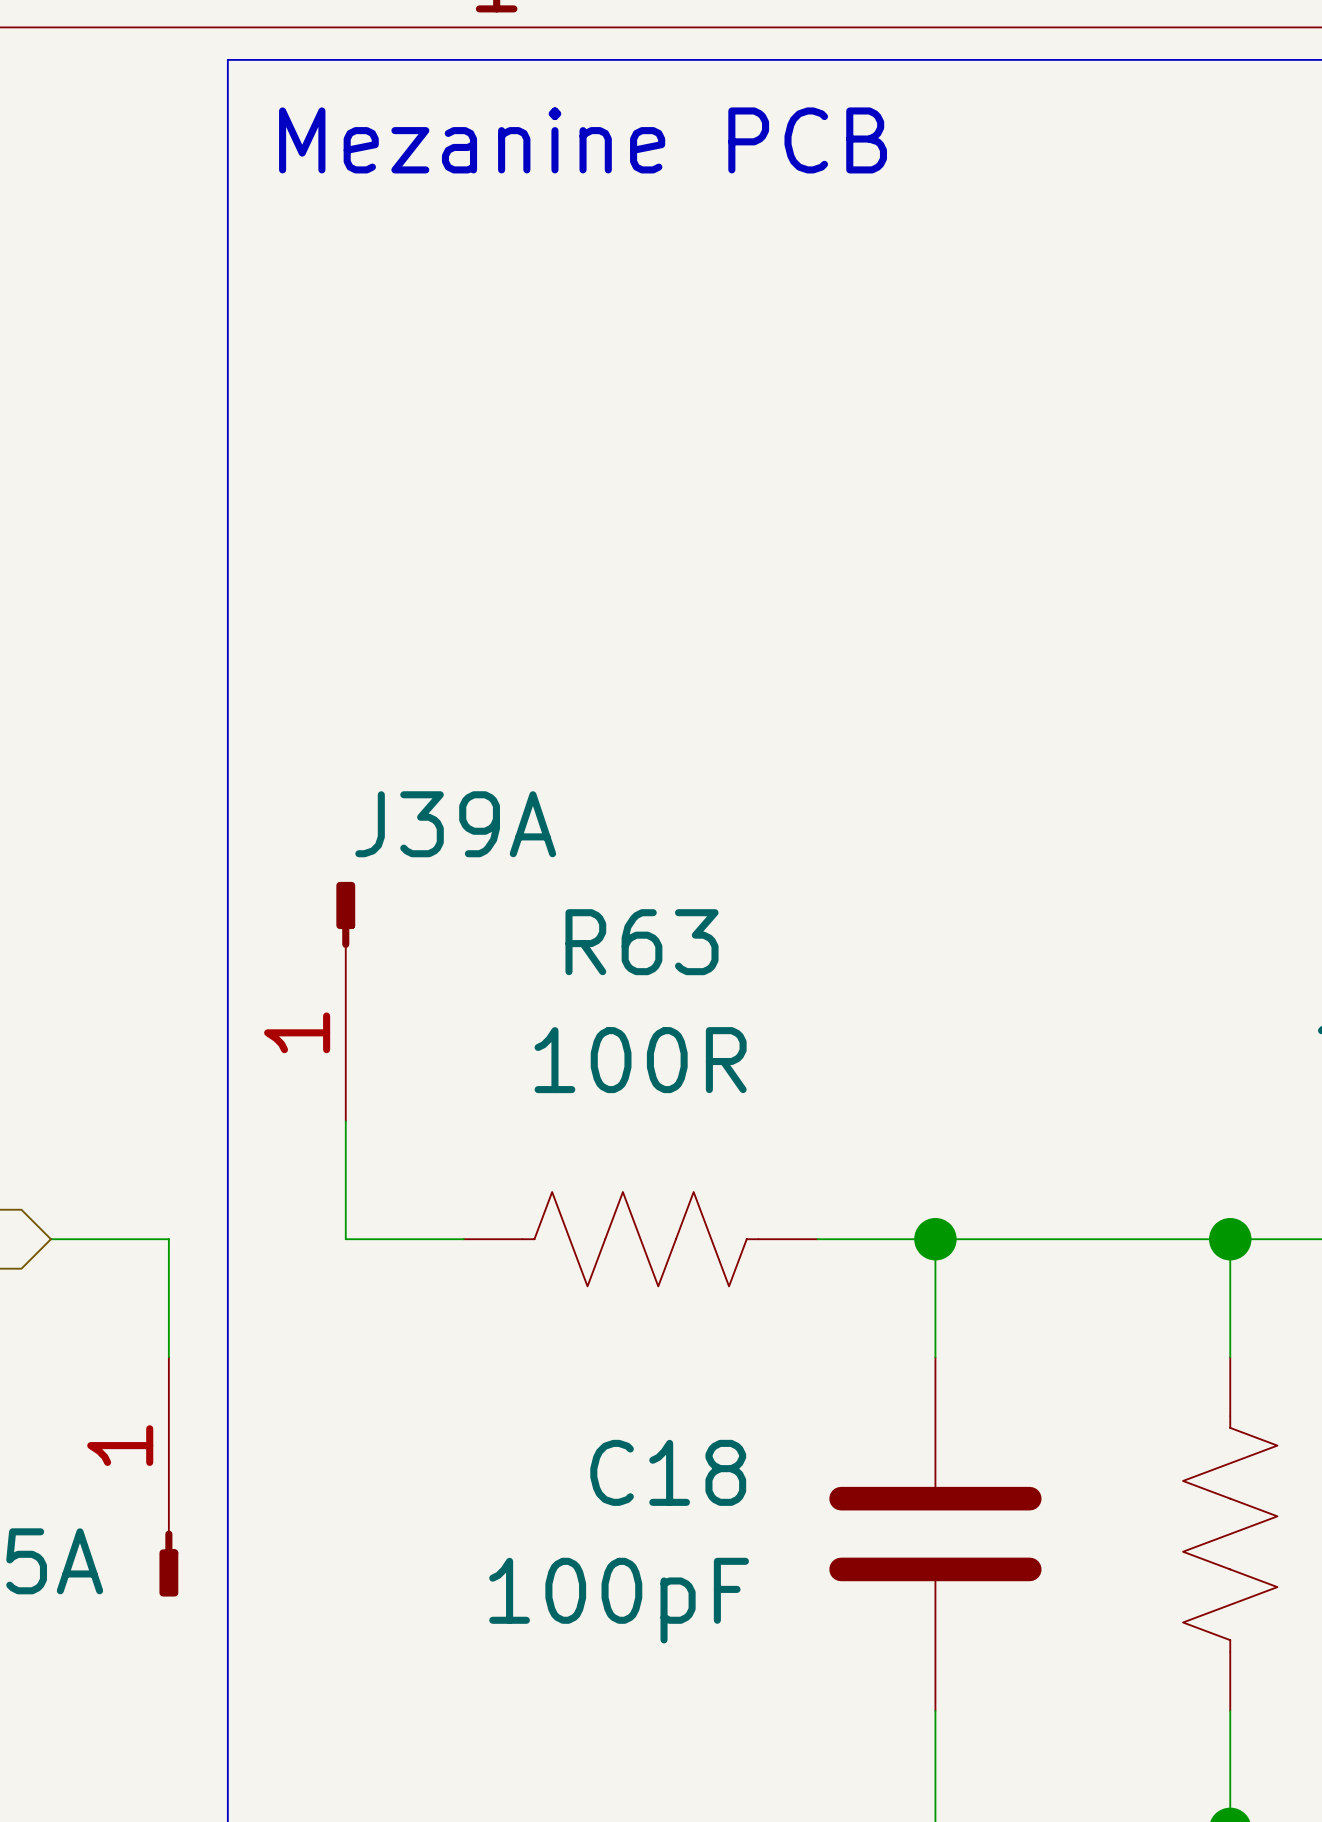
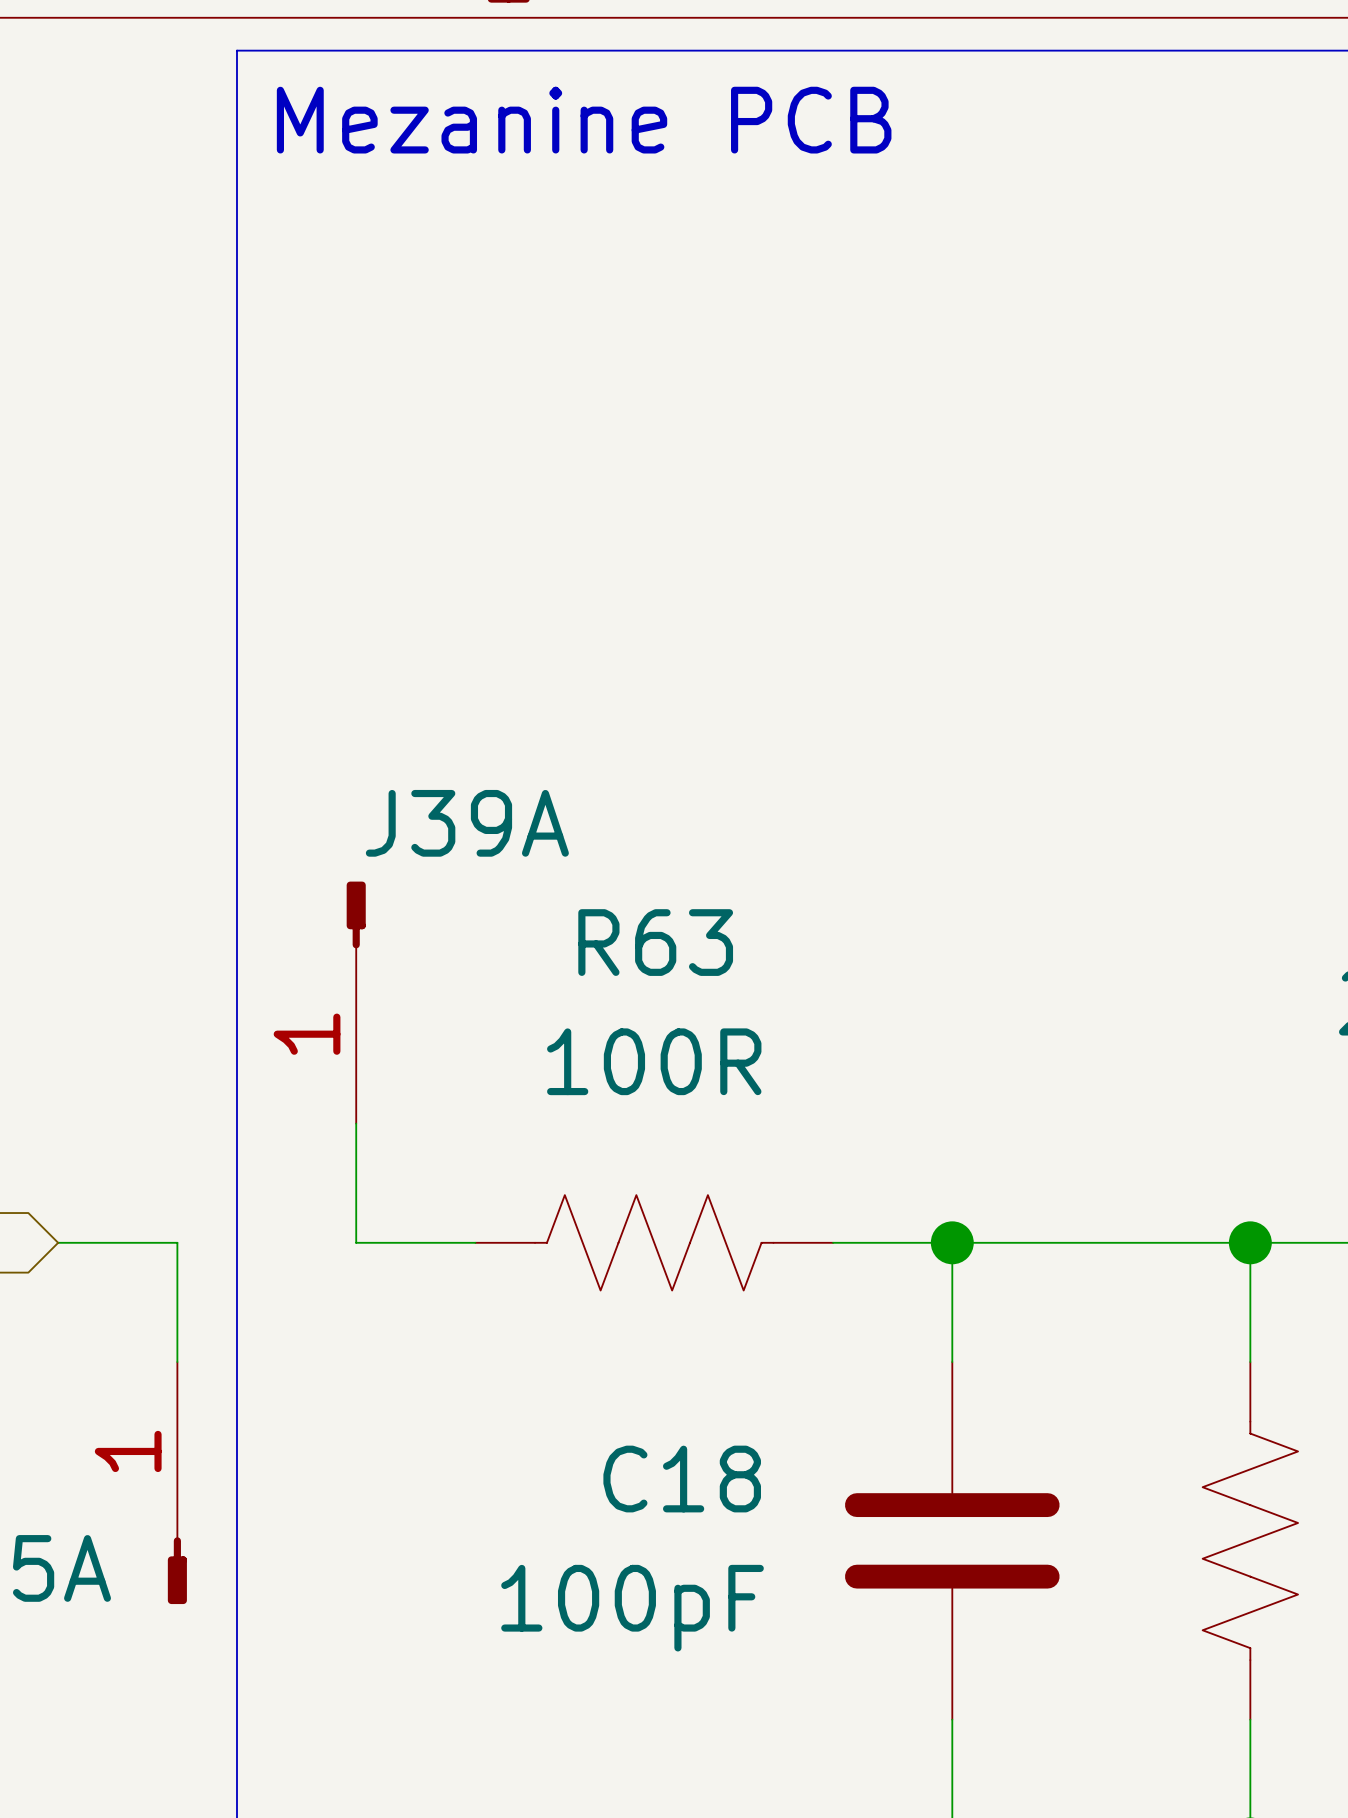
text position: Mezanine PCB (583, 140) -> Mezanine PCB (584, 120)

